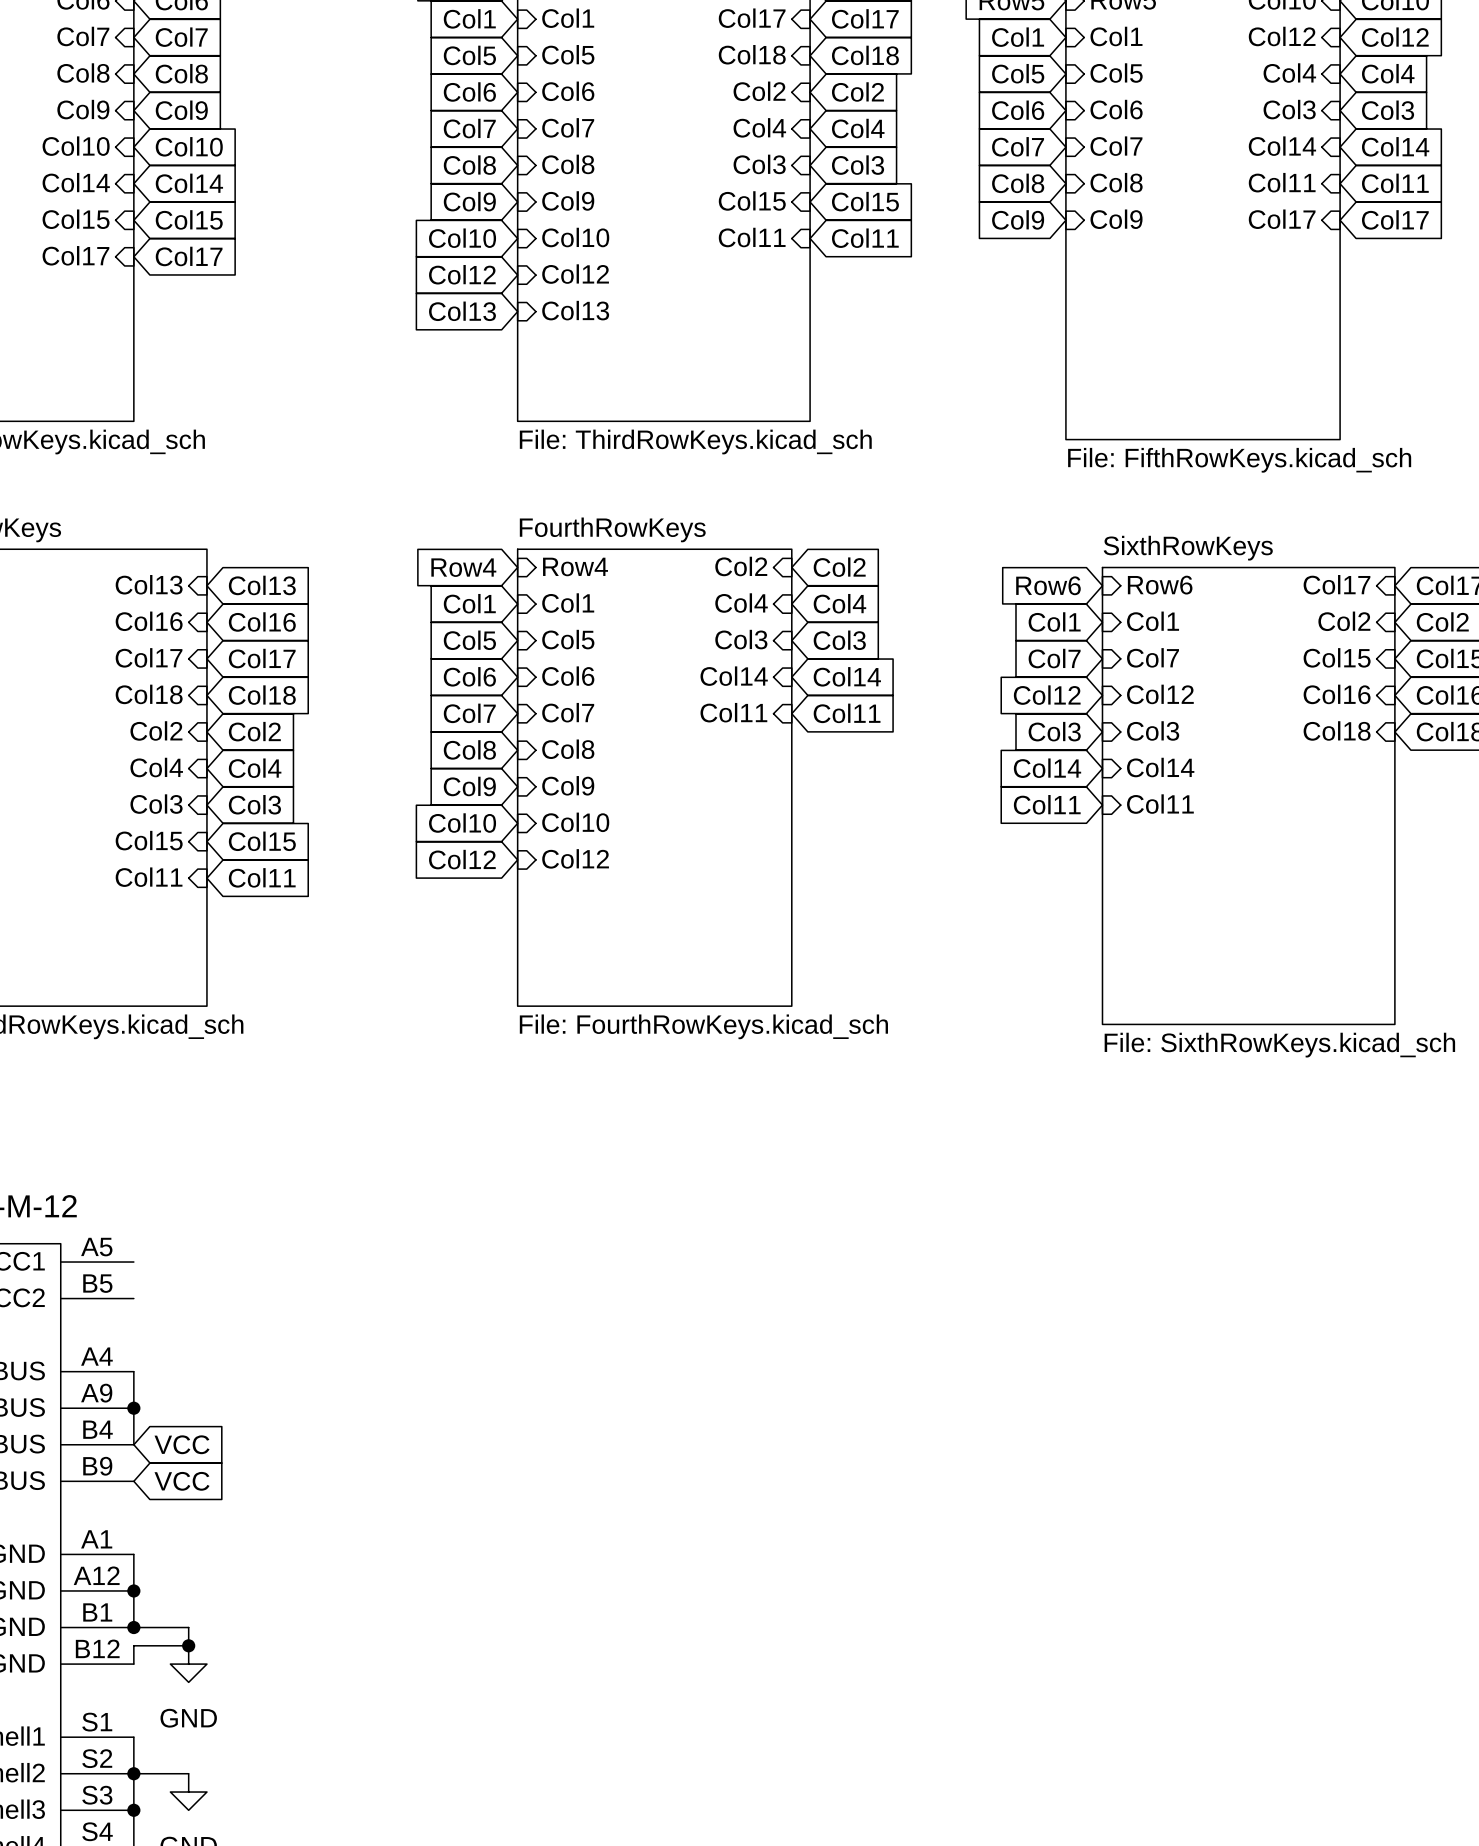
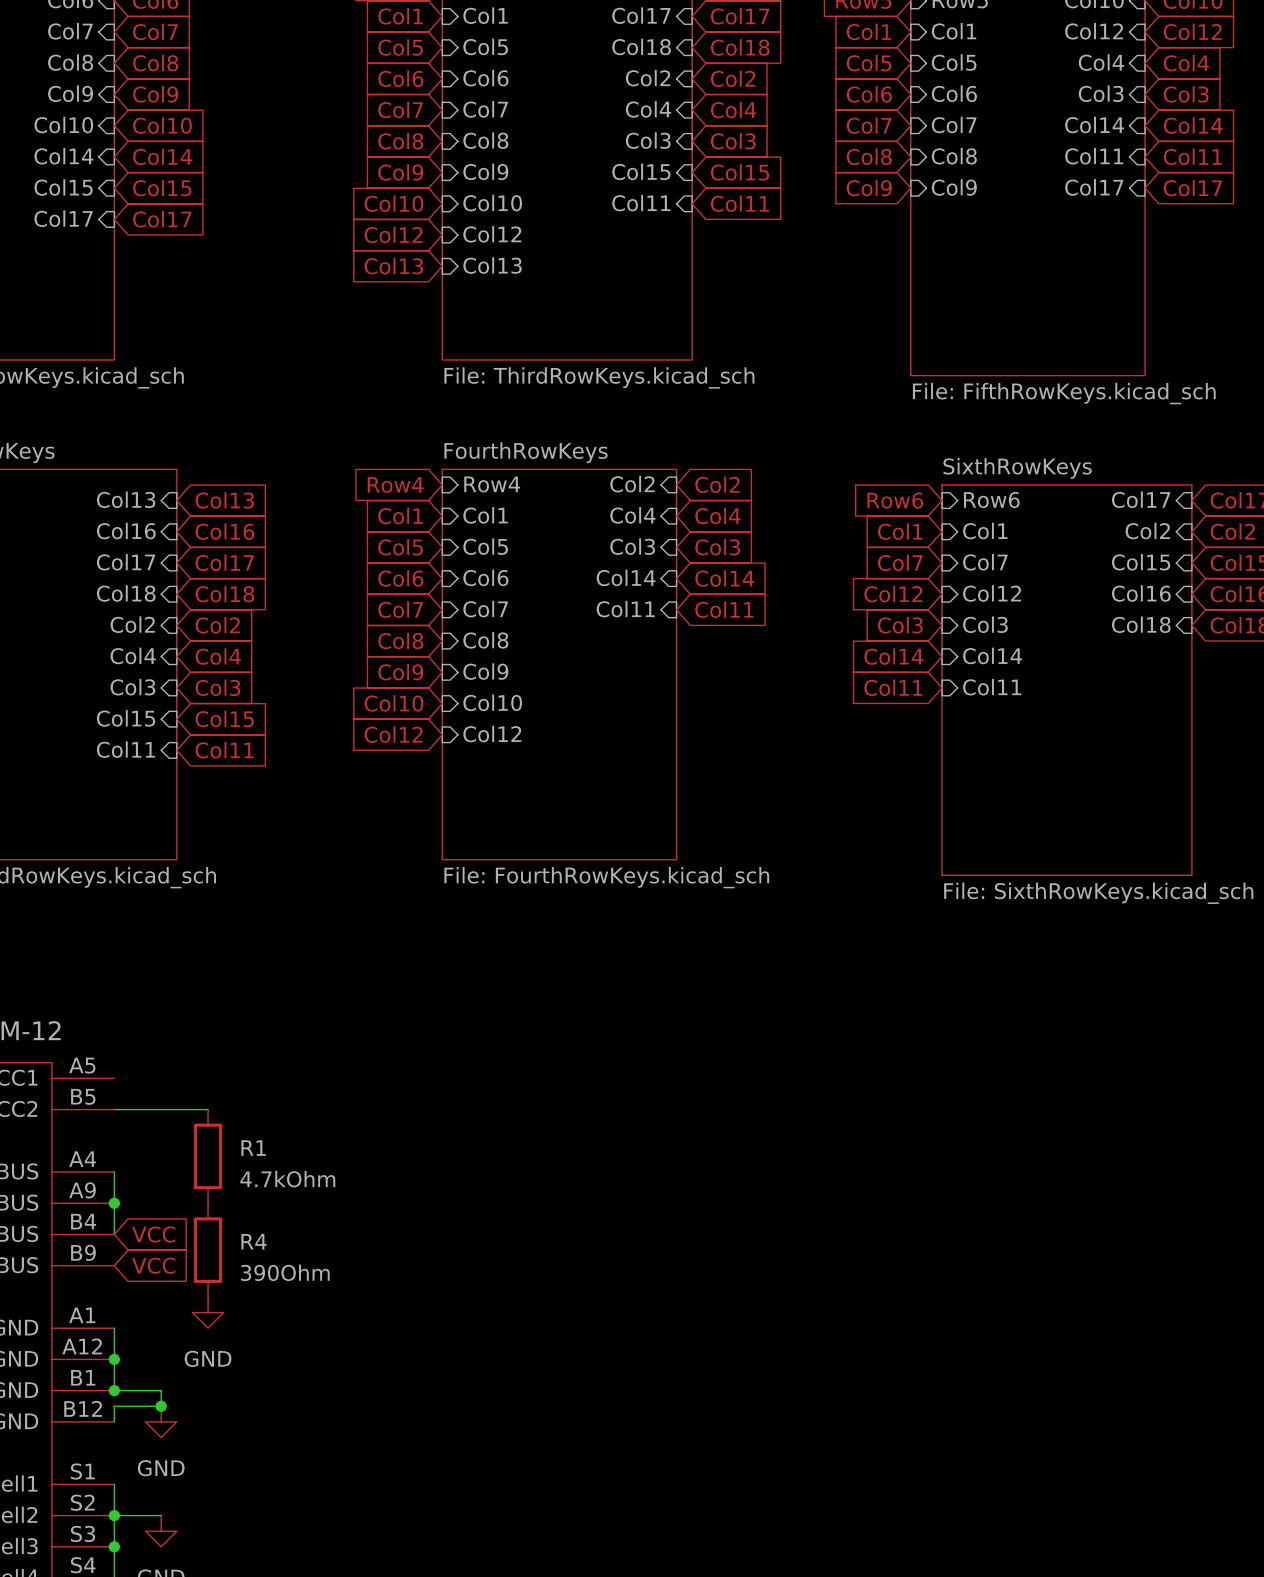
wire: none -> (114, 1109) (208, 1109)
R1: none -> 4.7kOhm (208, 1156)
R4: none -> 390Ohm (208, 1250)
power symbol: none -> GND (208, 1312)

